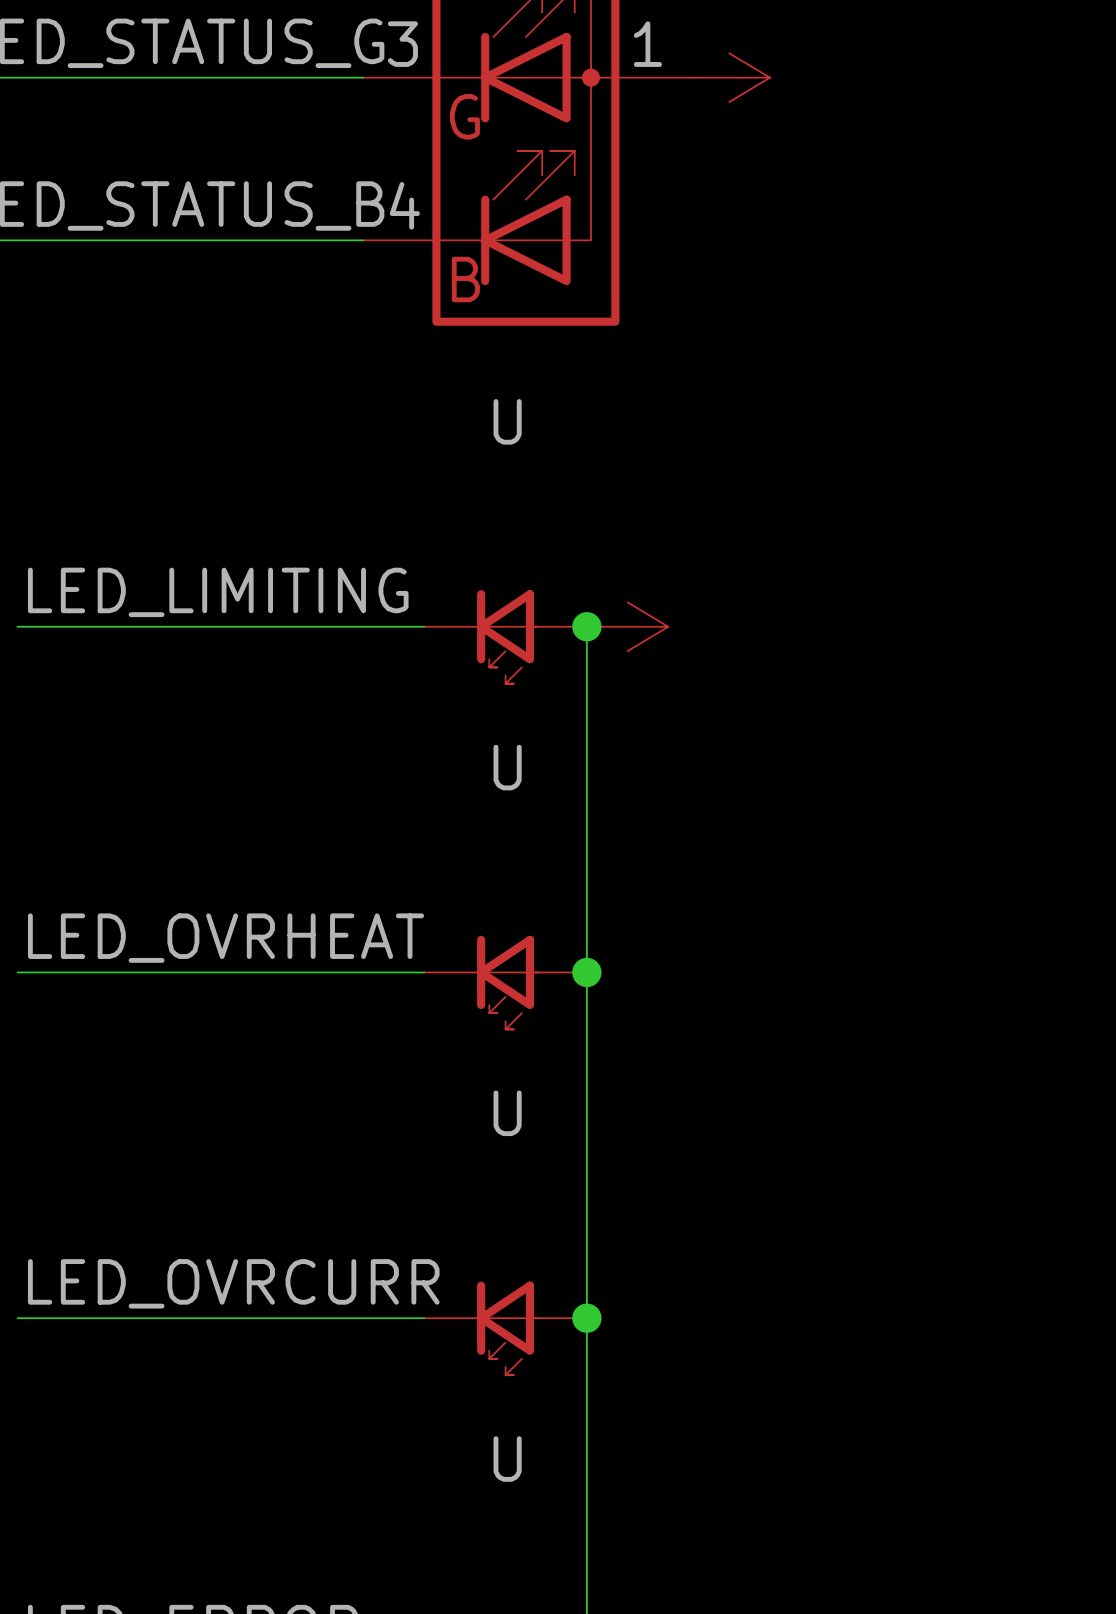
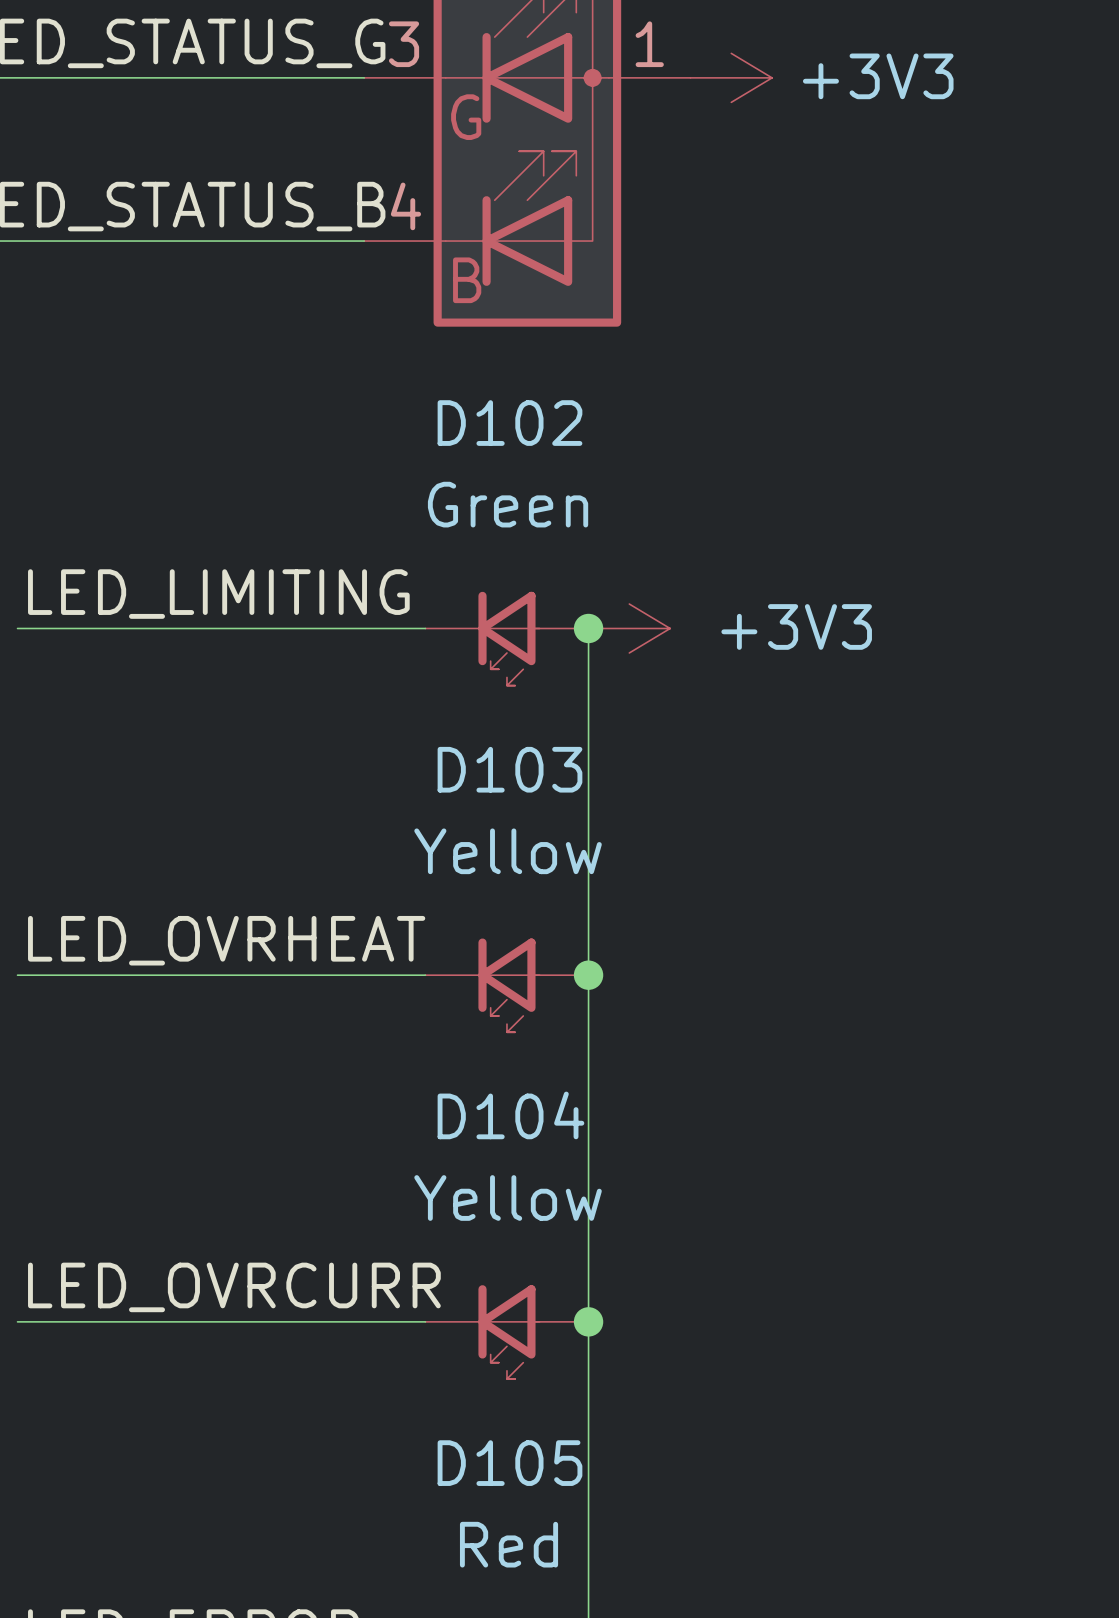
power symbol text: none -> +3V3 (878, 76)
U name: U (507, 421) -> D102 (509, 423)
U value: none -> Green (508, 504)
power symbol text: none -> +3V3 (796, 626)
U name: U (507, 767) -> D103 (509, 769)
U value: none -> Yellow (508, 851)
U name: U (507, 1113) -> D104 (510, 1115)
U value: none -> Yellow (508, 1197)
U name: U (507, 1459) -> D105 (509, 1463)
U value: none -> Red (509, 1544)

